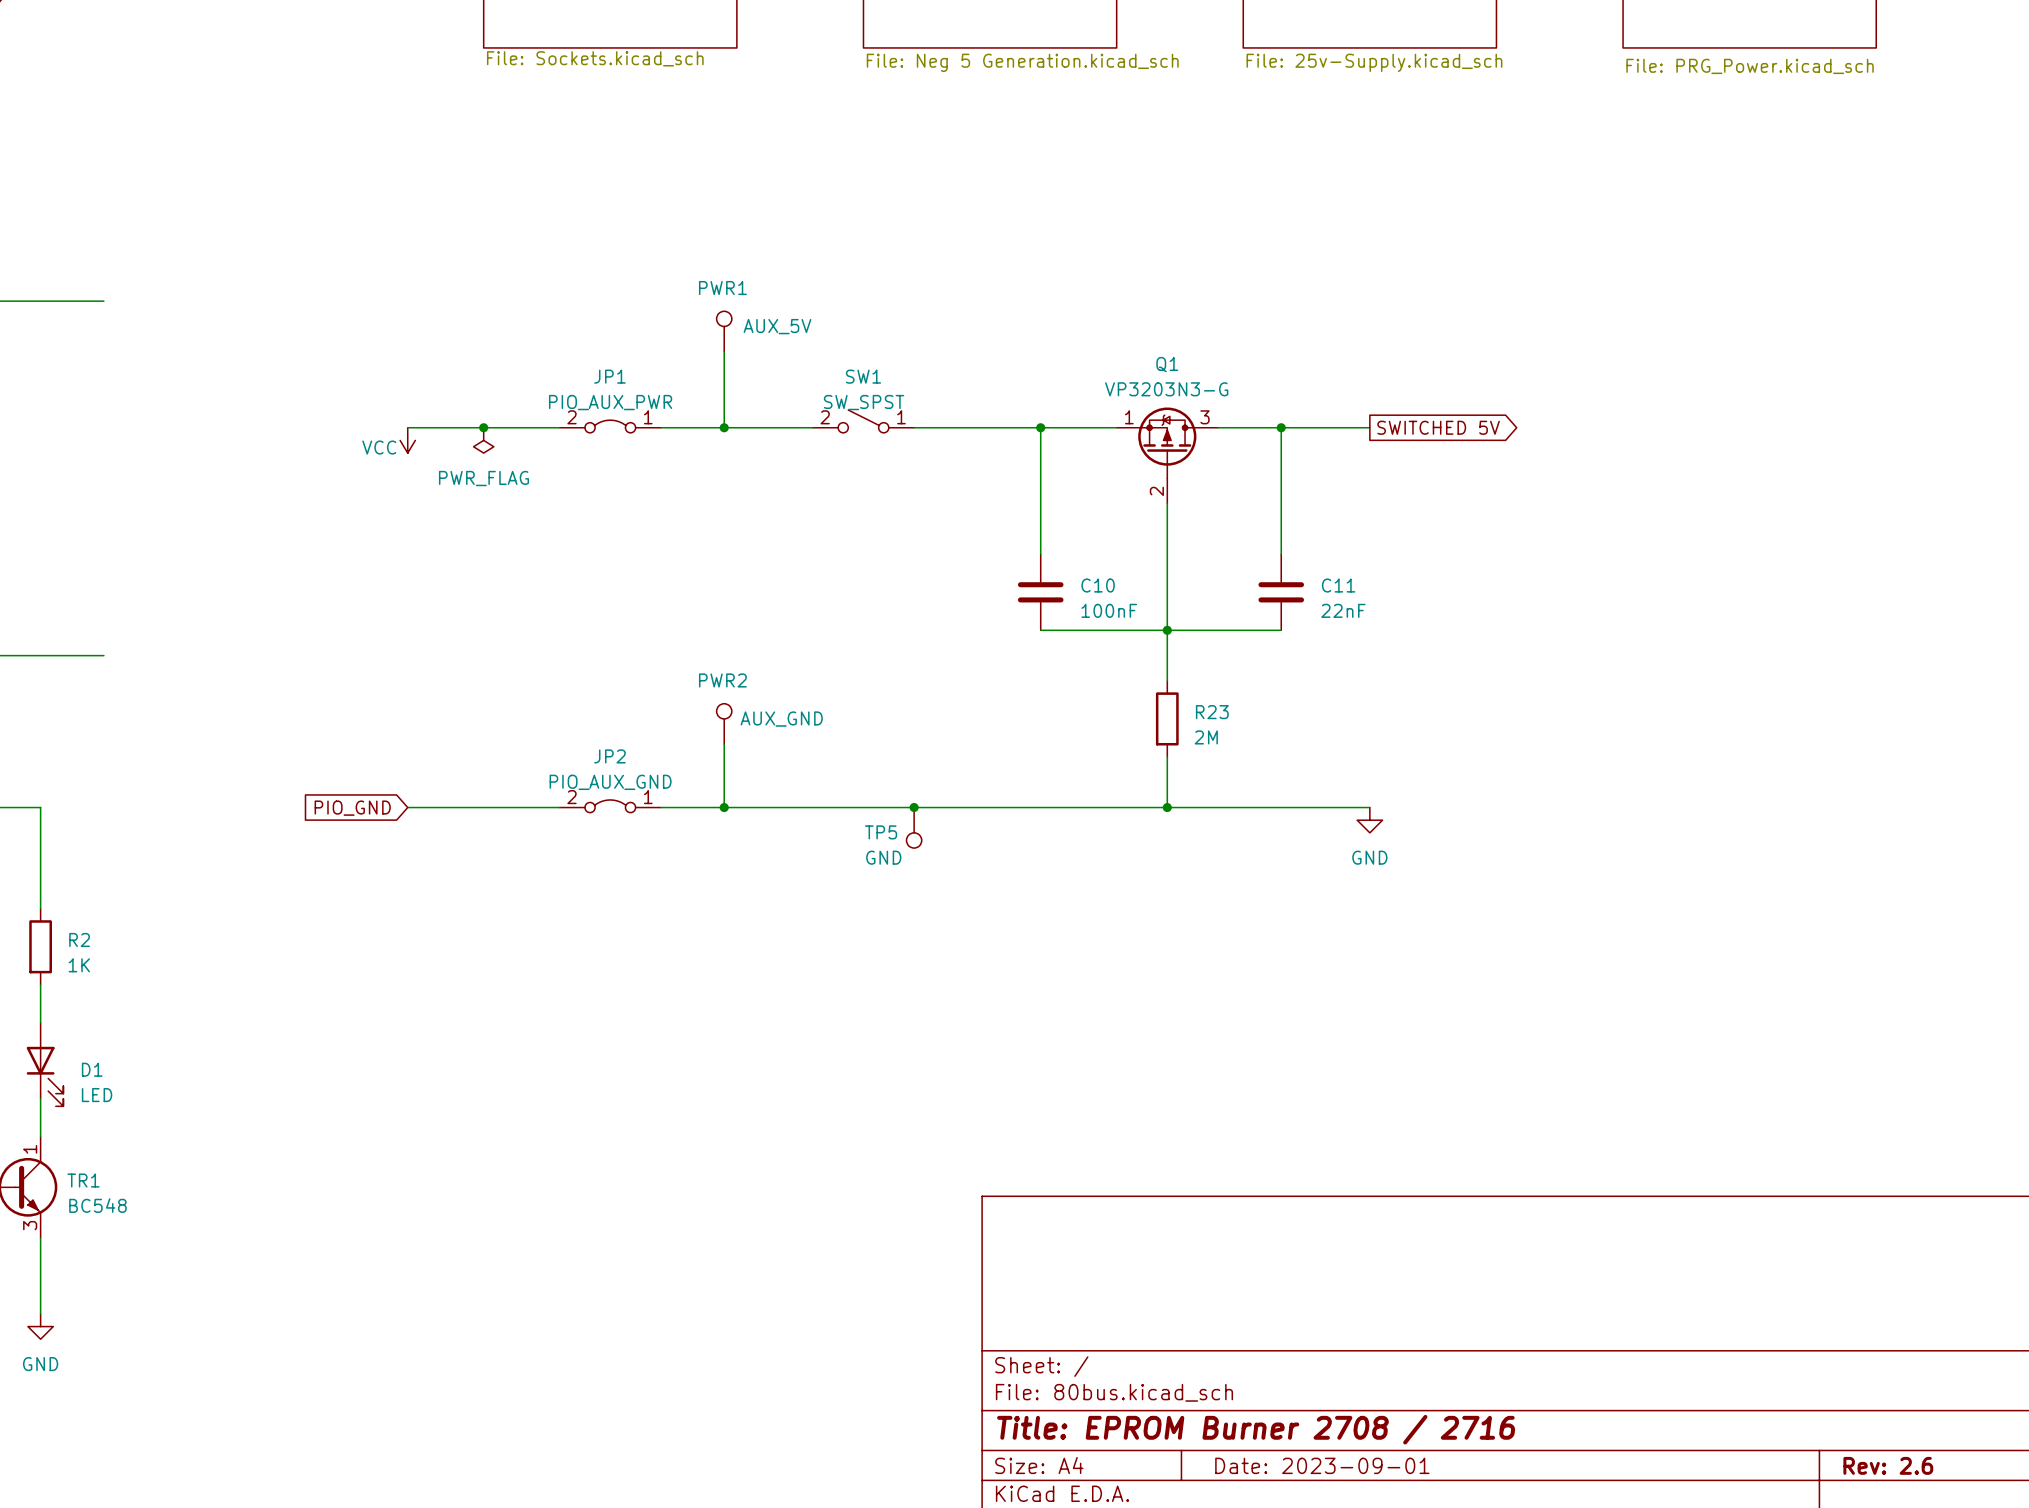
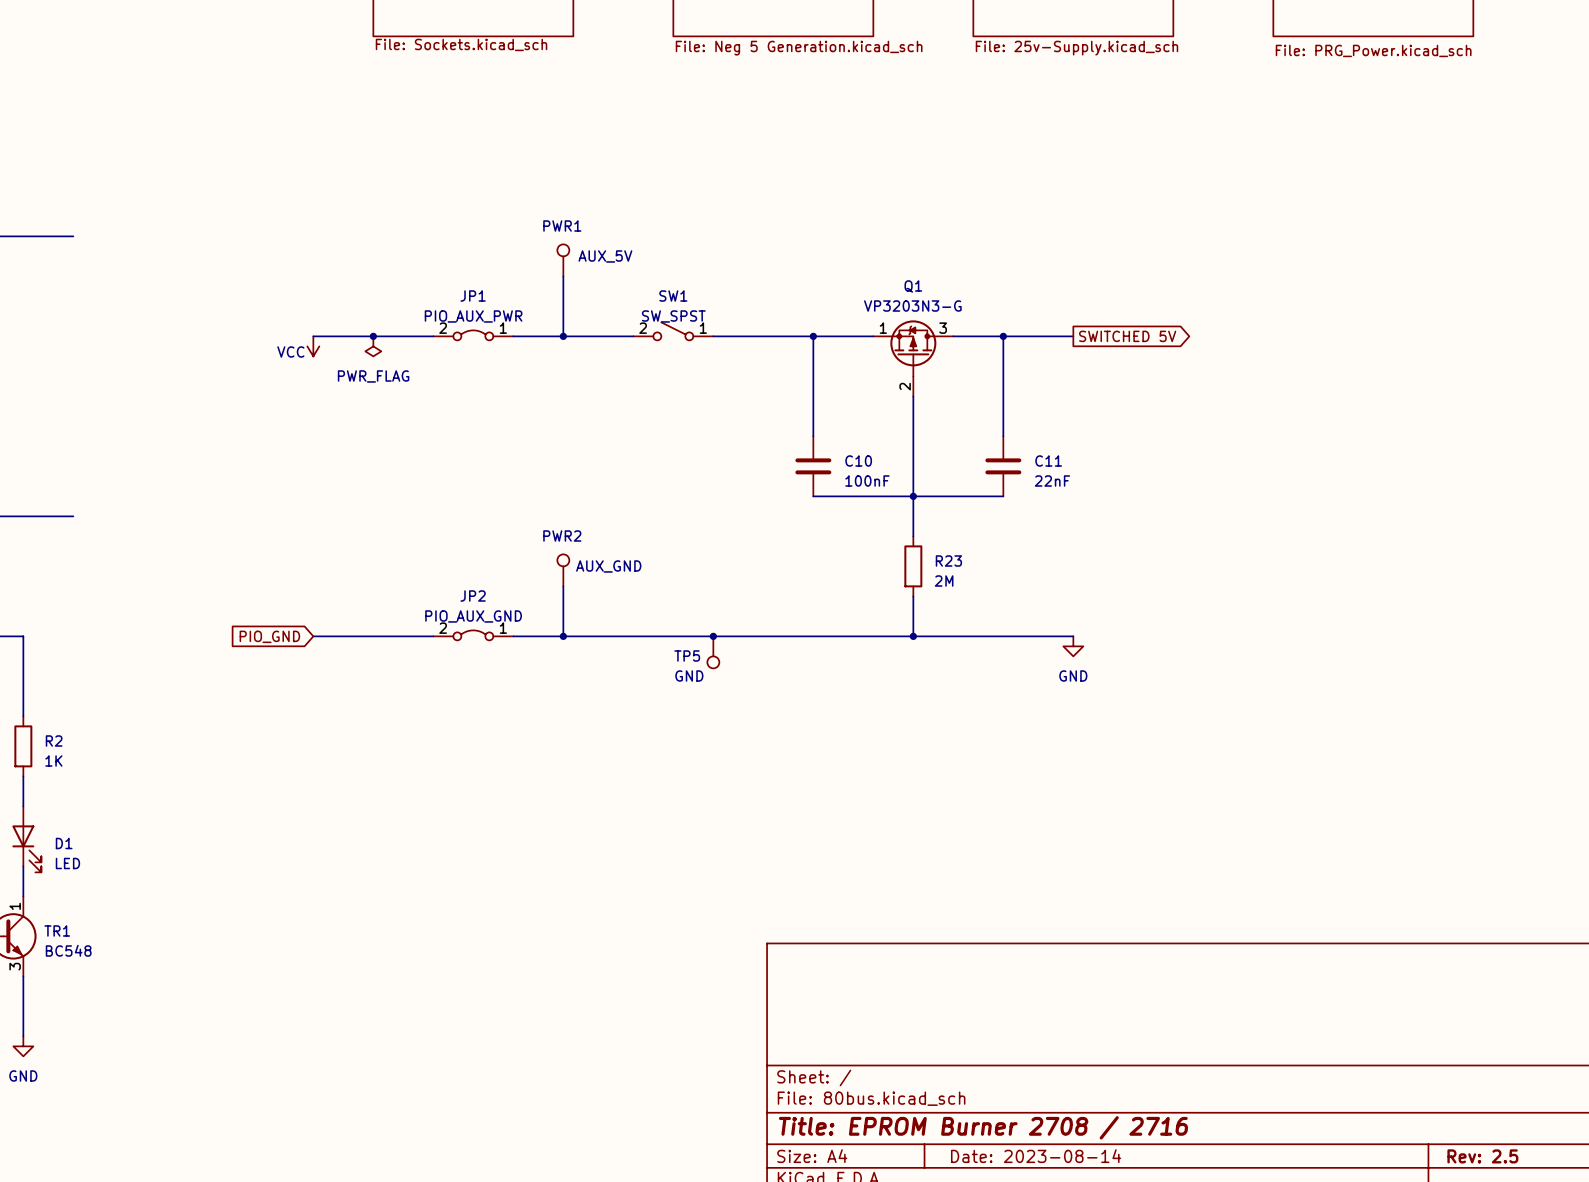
title block: Date: 2023-09-01 (1322, 1465) -> Date: 2023-08-14 (1036, 1156)
title block: Rev: 2.6 (1888, 1465) -> Rev: 2.5 (1482, 1156)

